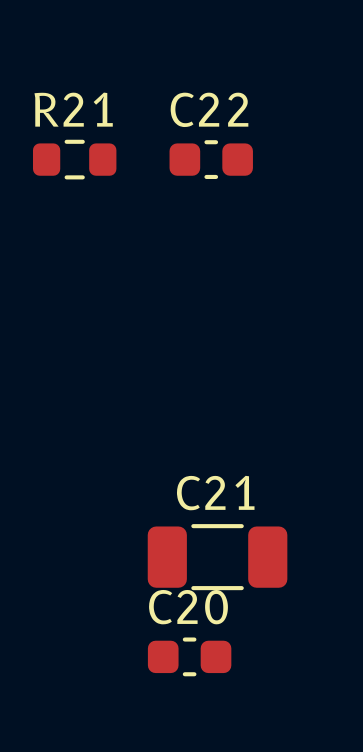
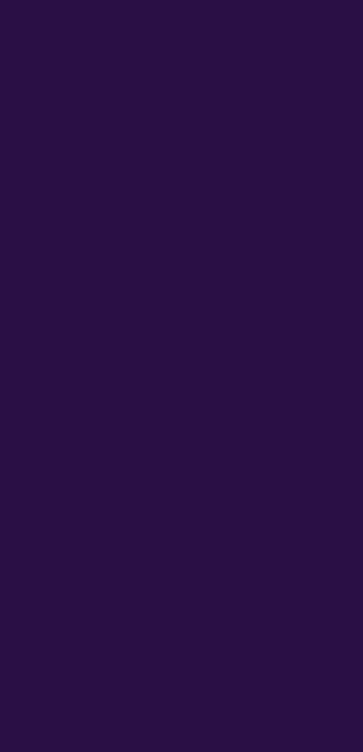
R21: (74, 159) -> none
C22: (211, 159) -> none
C21: (217, 557) -> none
C20: (189, 656) -> none

